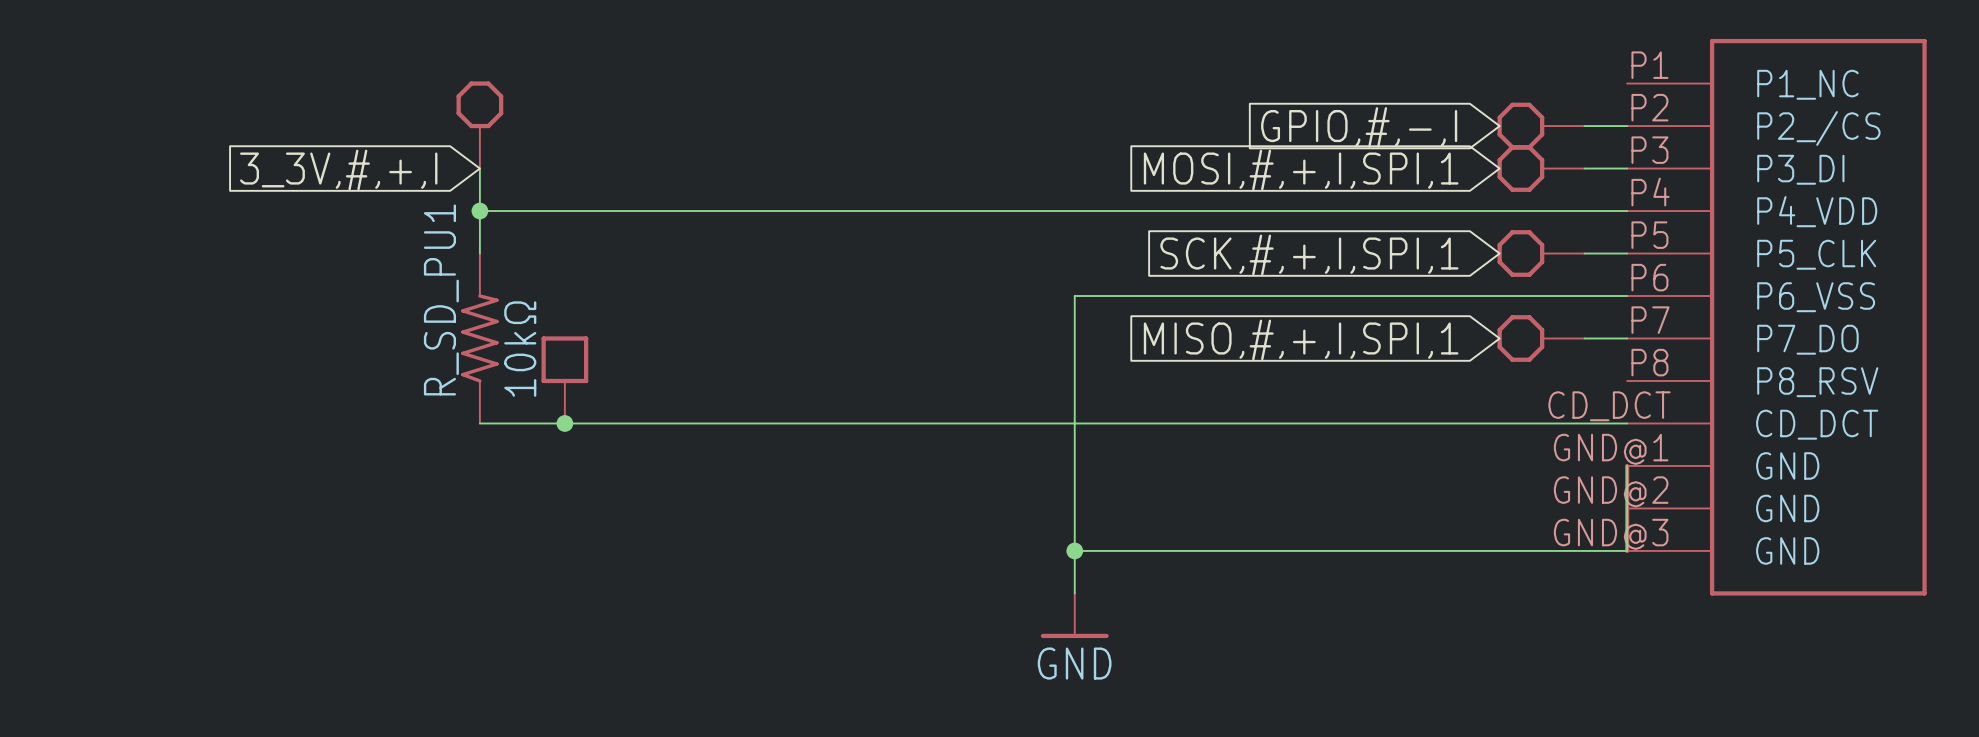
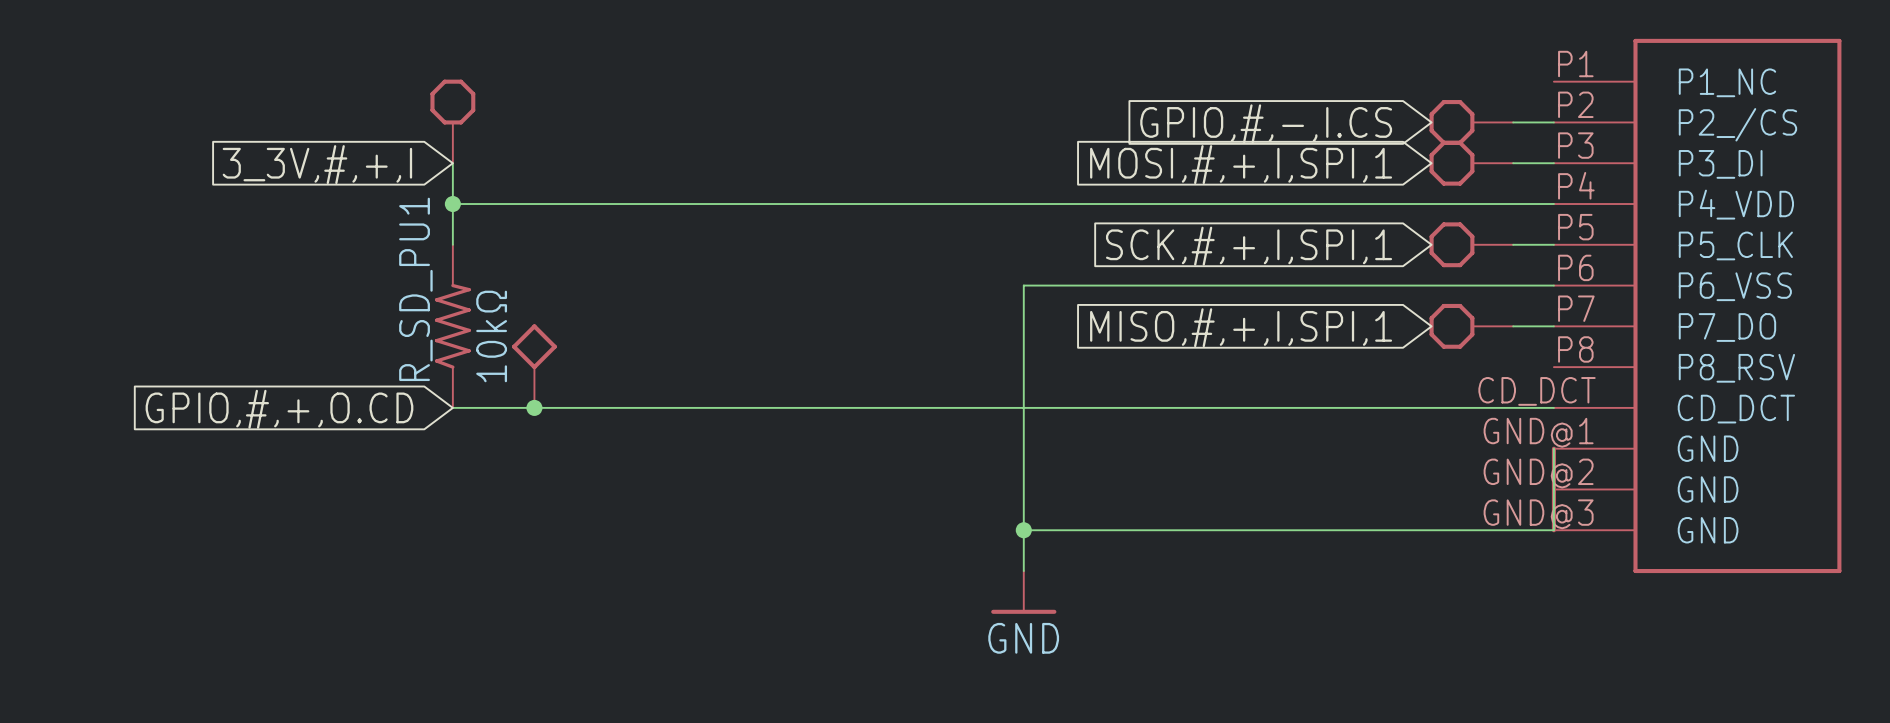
global label: GPIO,#,-,I (1359, 127) -> GPIO,#,-,I.CS (1266, 123)
power symbol shape: [541, 336, 589, 424] -> [512, 324, 557, 408]
global label: none -> GPIO,#,+,O.CD (279, 409)

